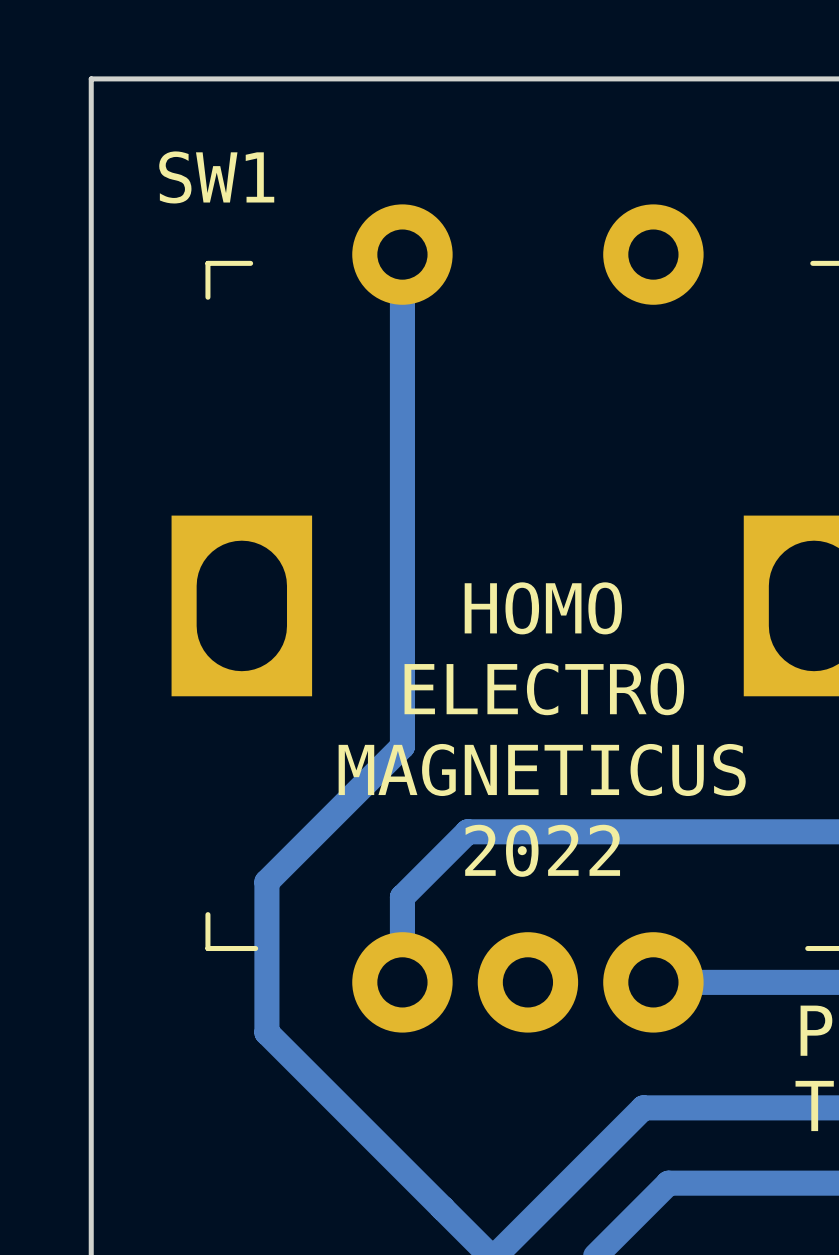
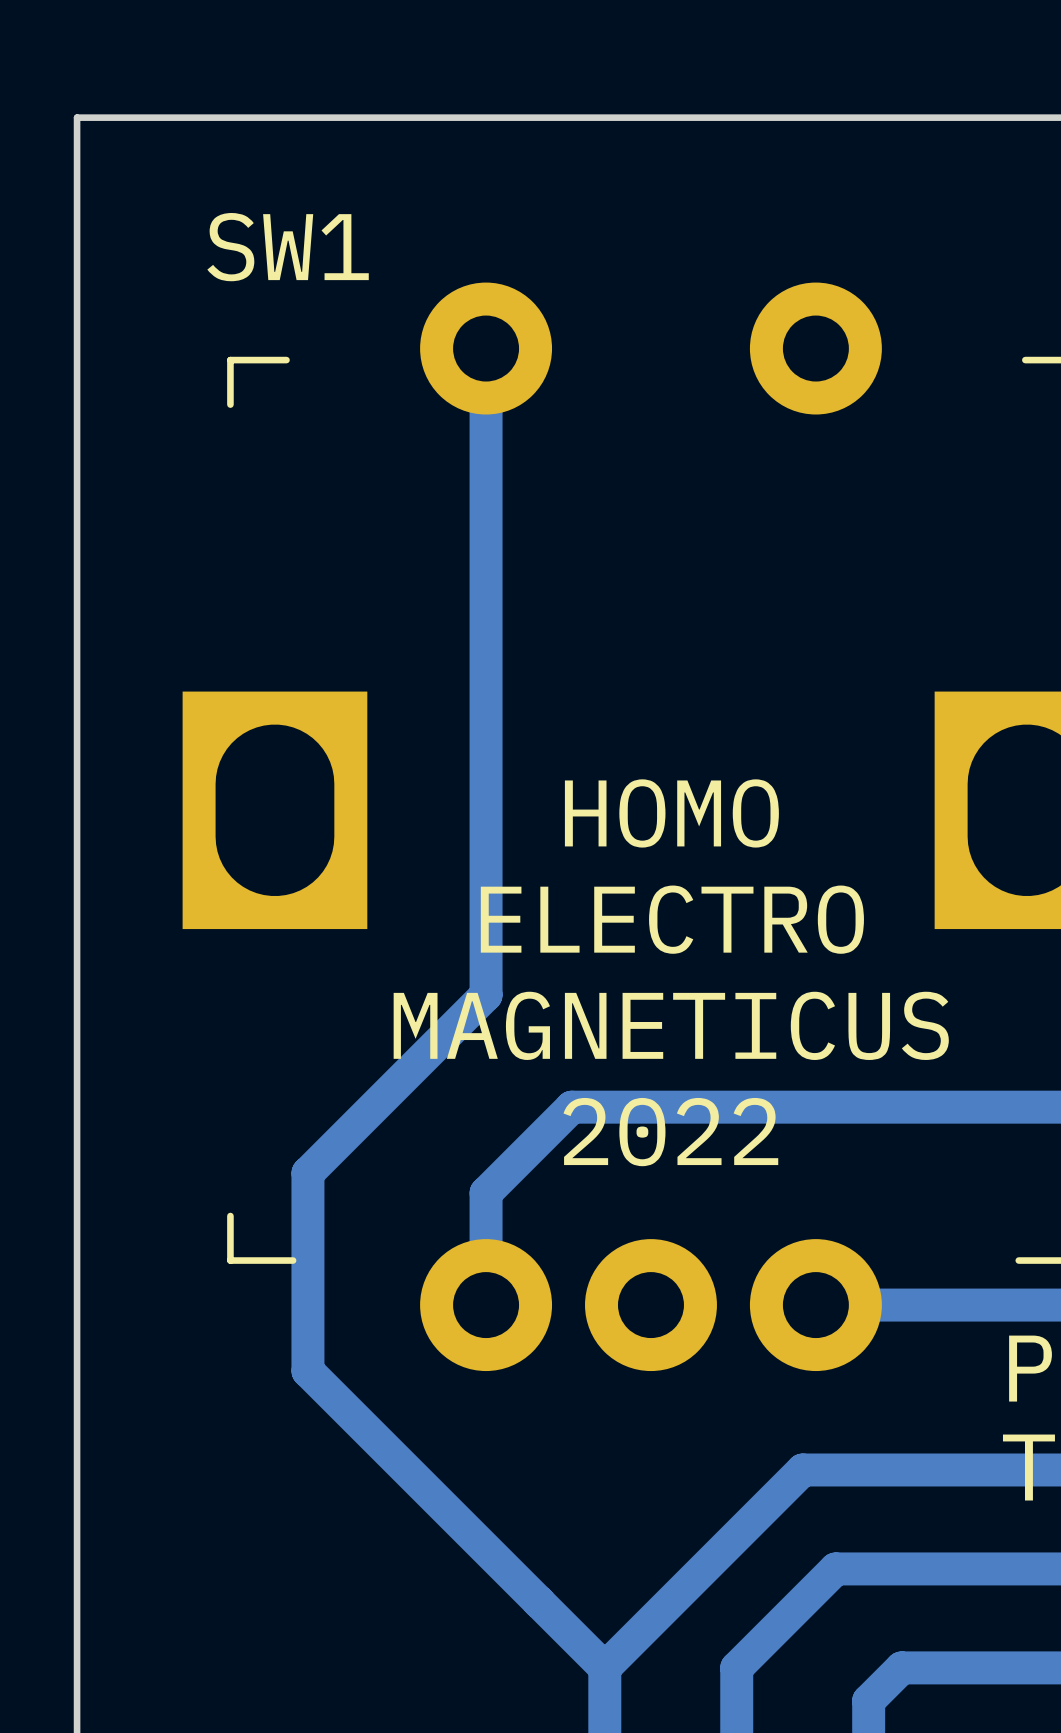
SW1 name position: SW1 (216, 177) -> SW1 (288, 247)

